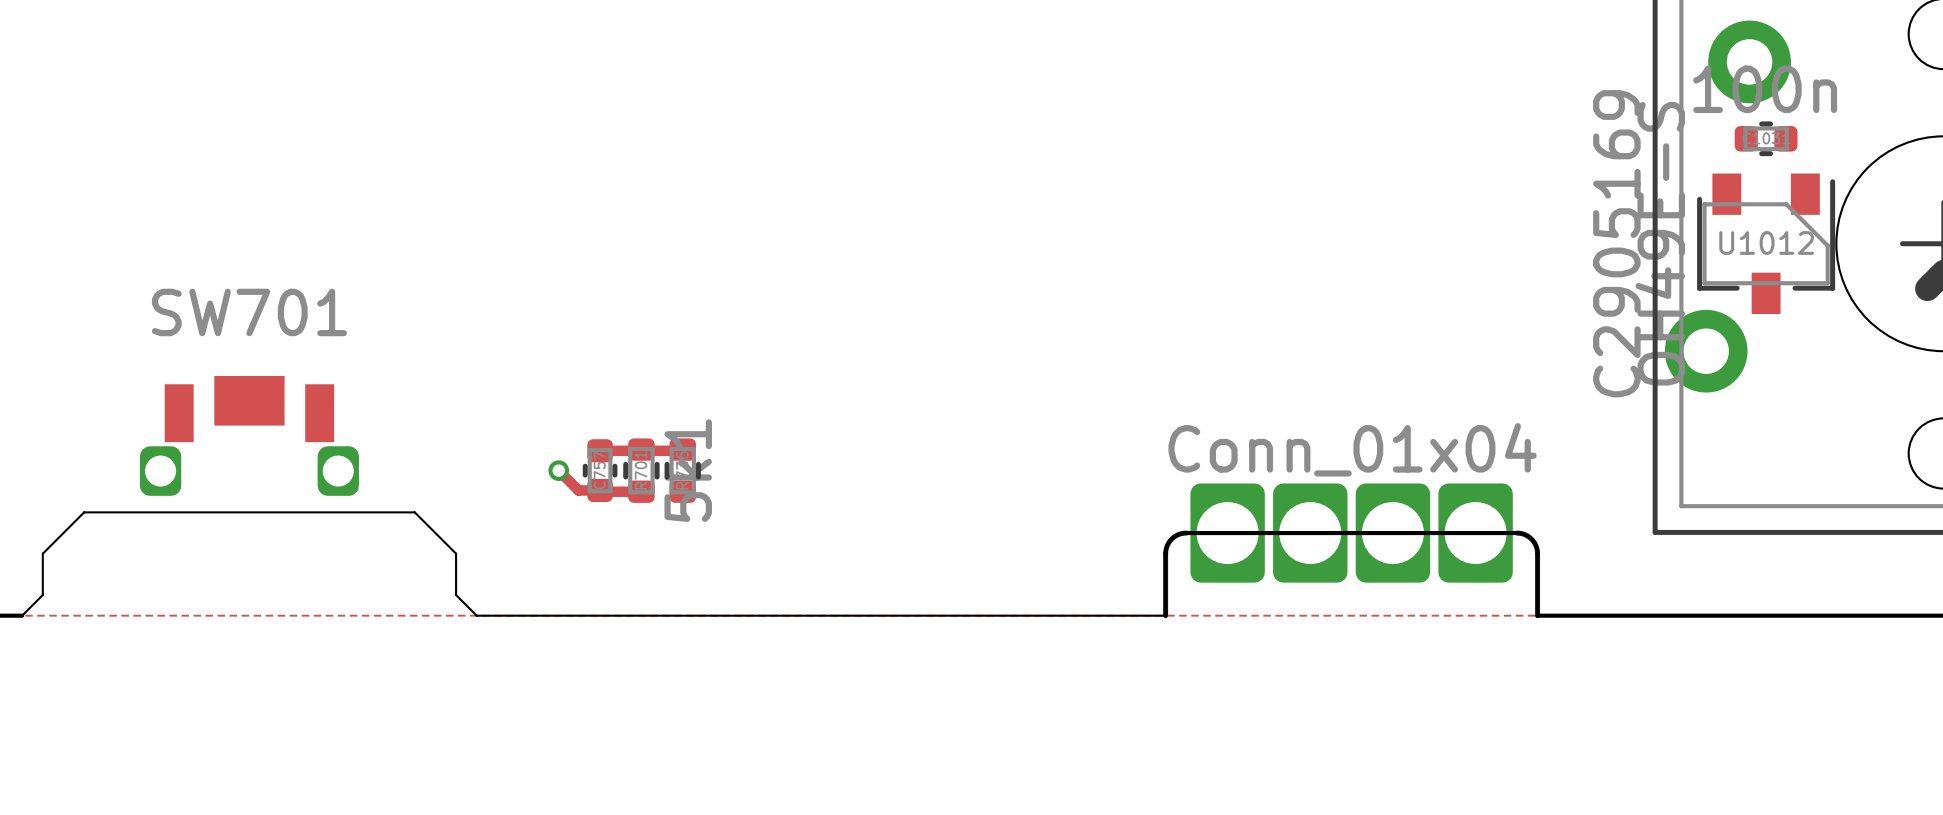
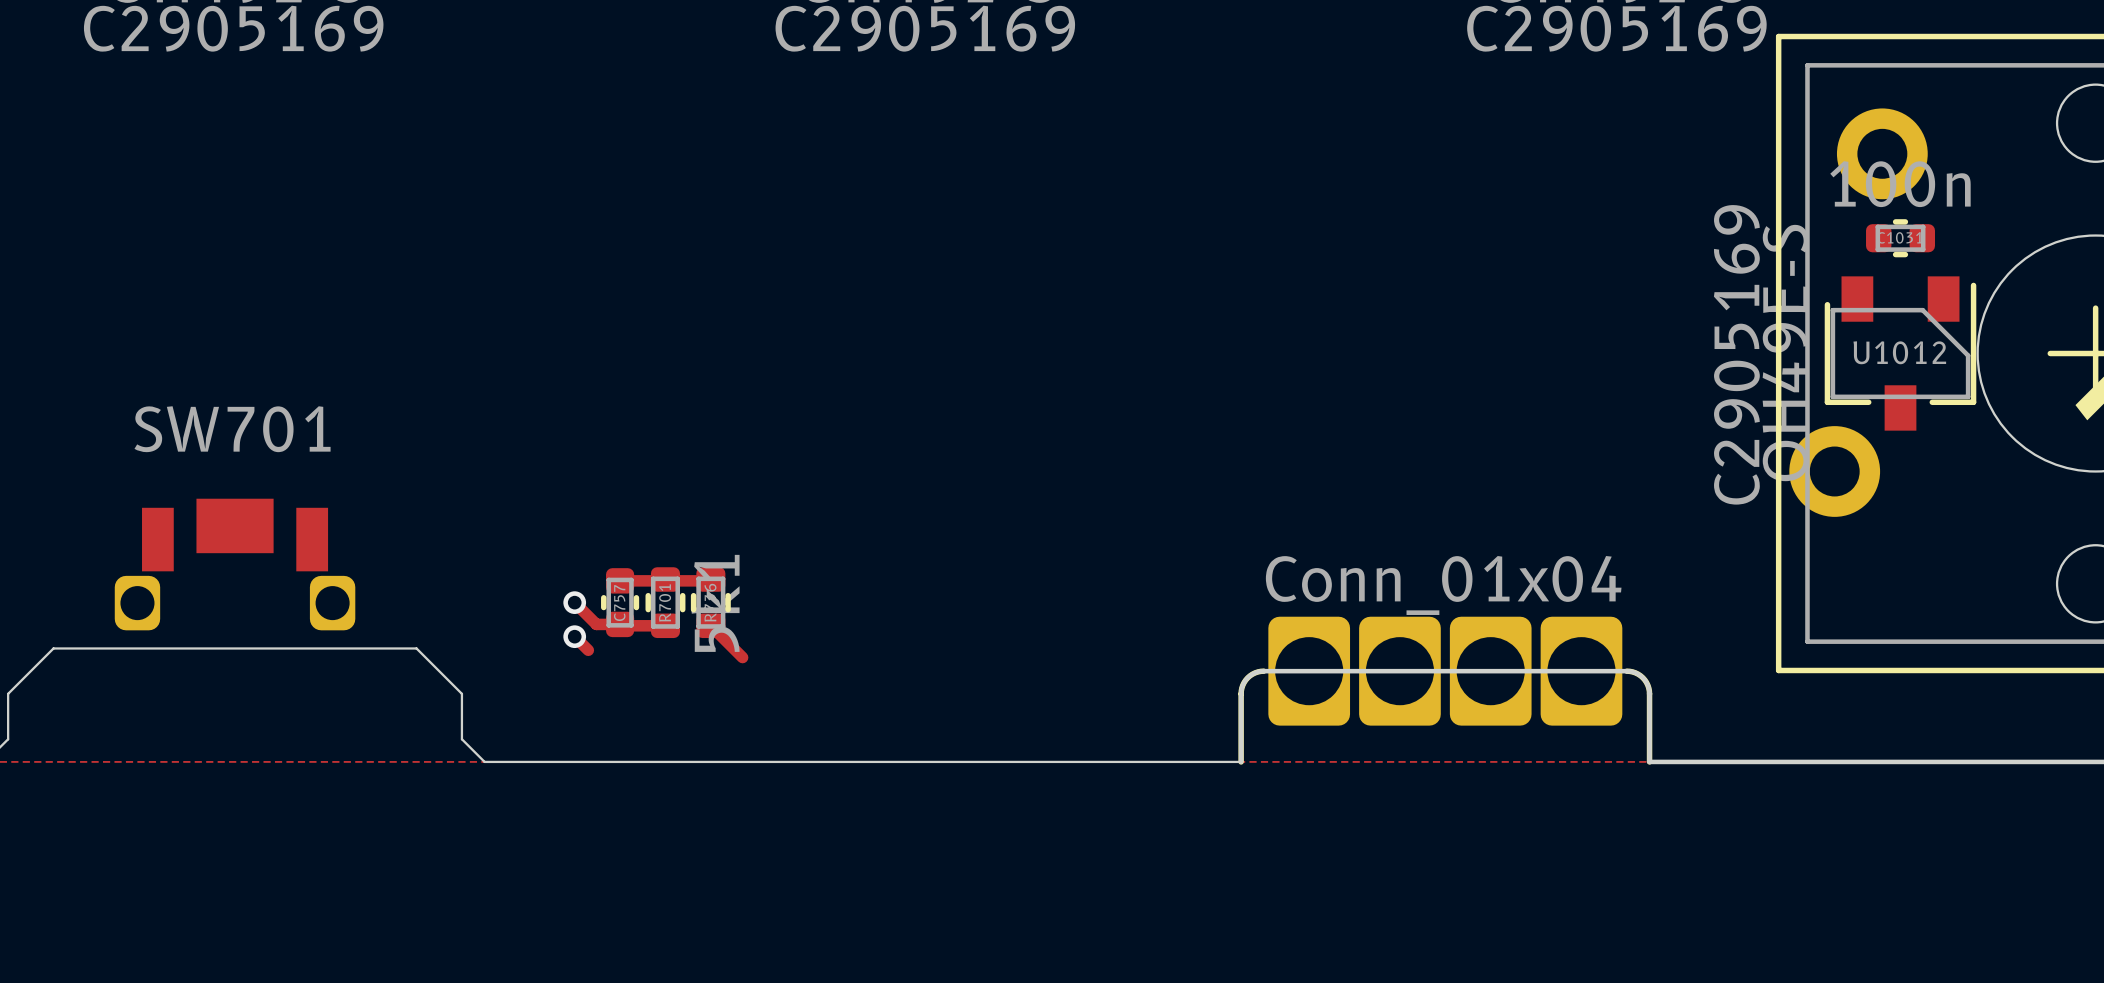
track: none -> (710, 625) (742, 657)
track: none -> (574, 636) (588, 650)
via: none -> (574, 636)

